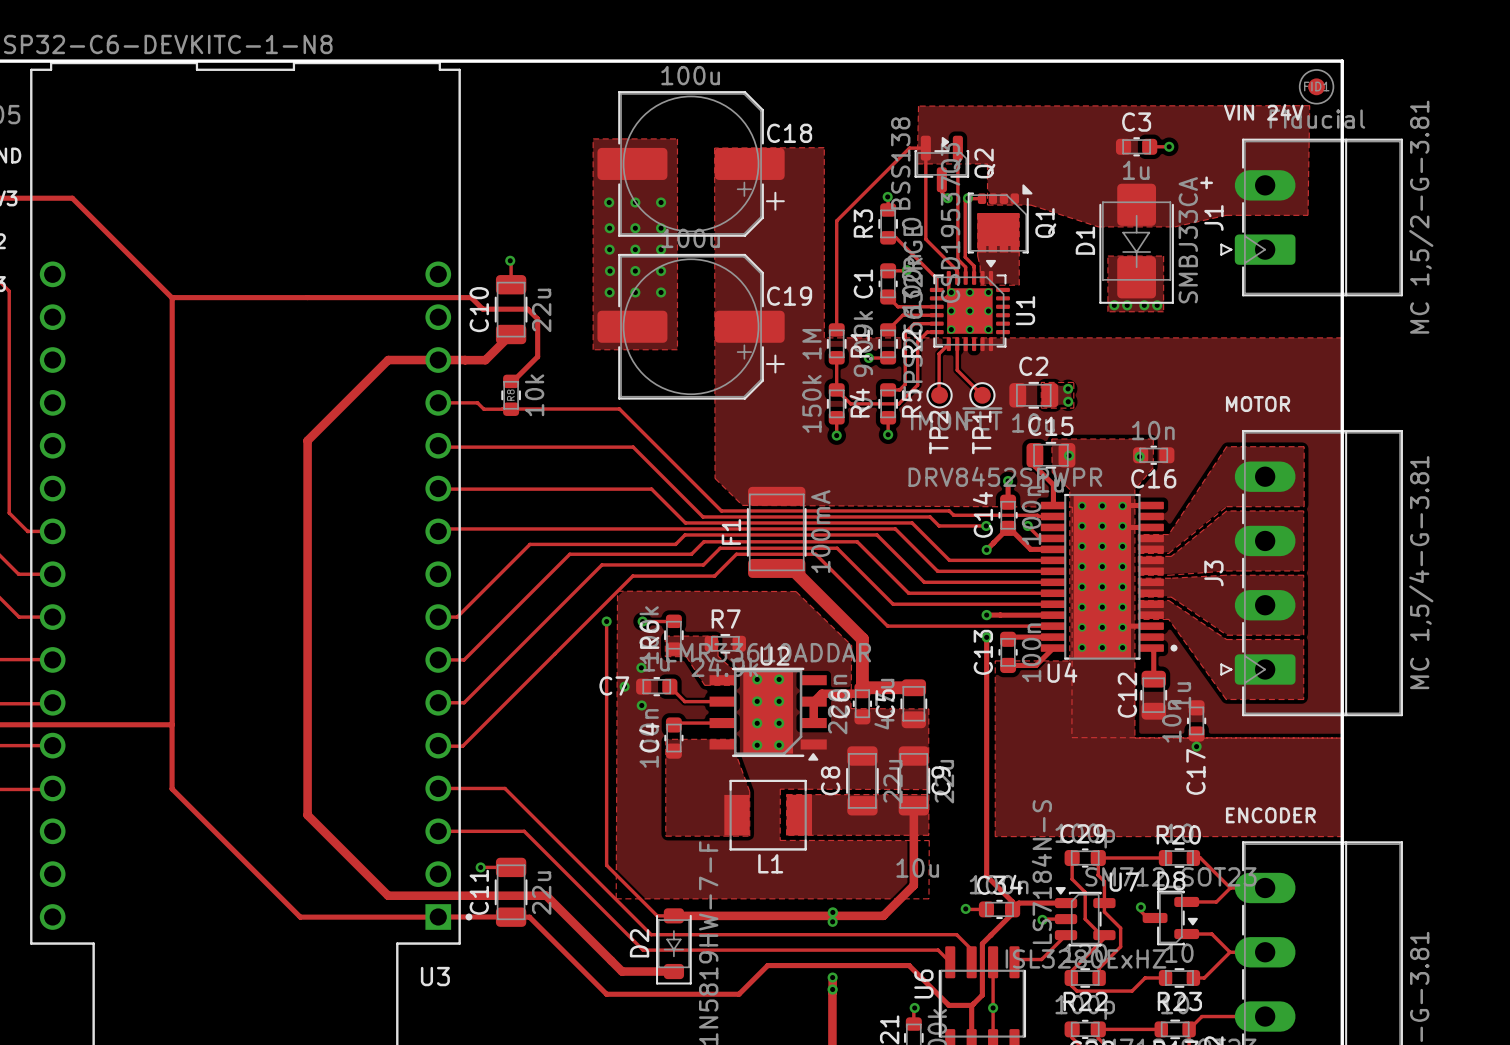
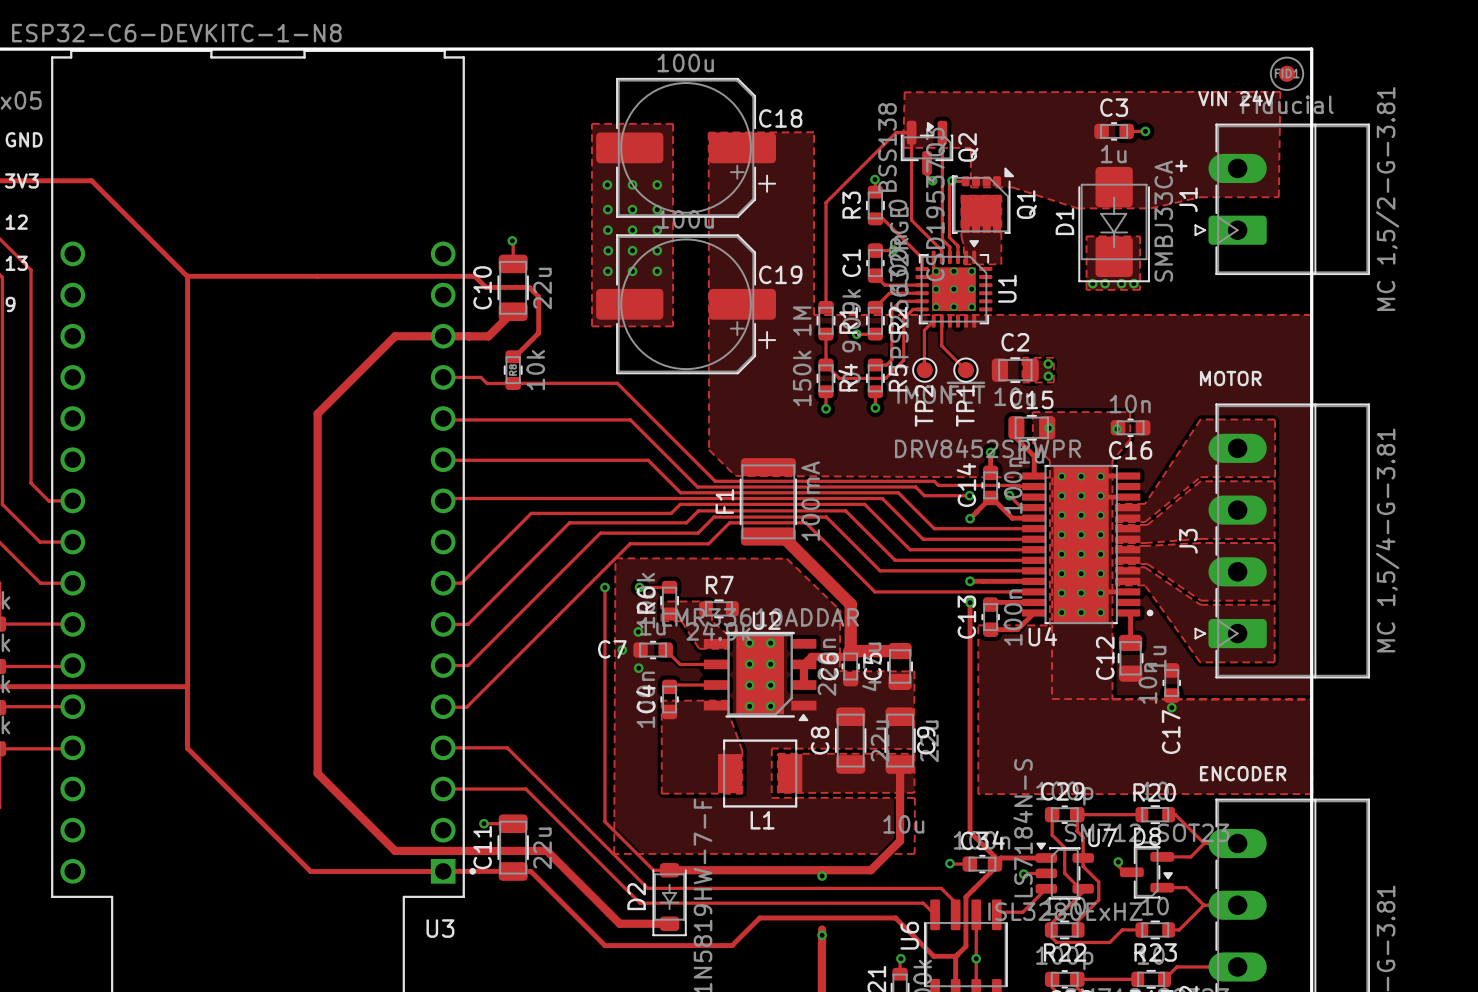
via: (832, 912) -> none
via: (832, 977) -> none
via: none -> (822, 935)
via: (832, 989) -> none

